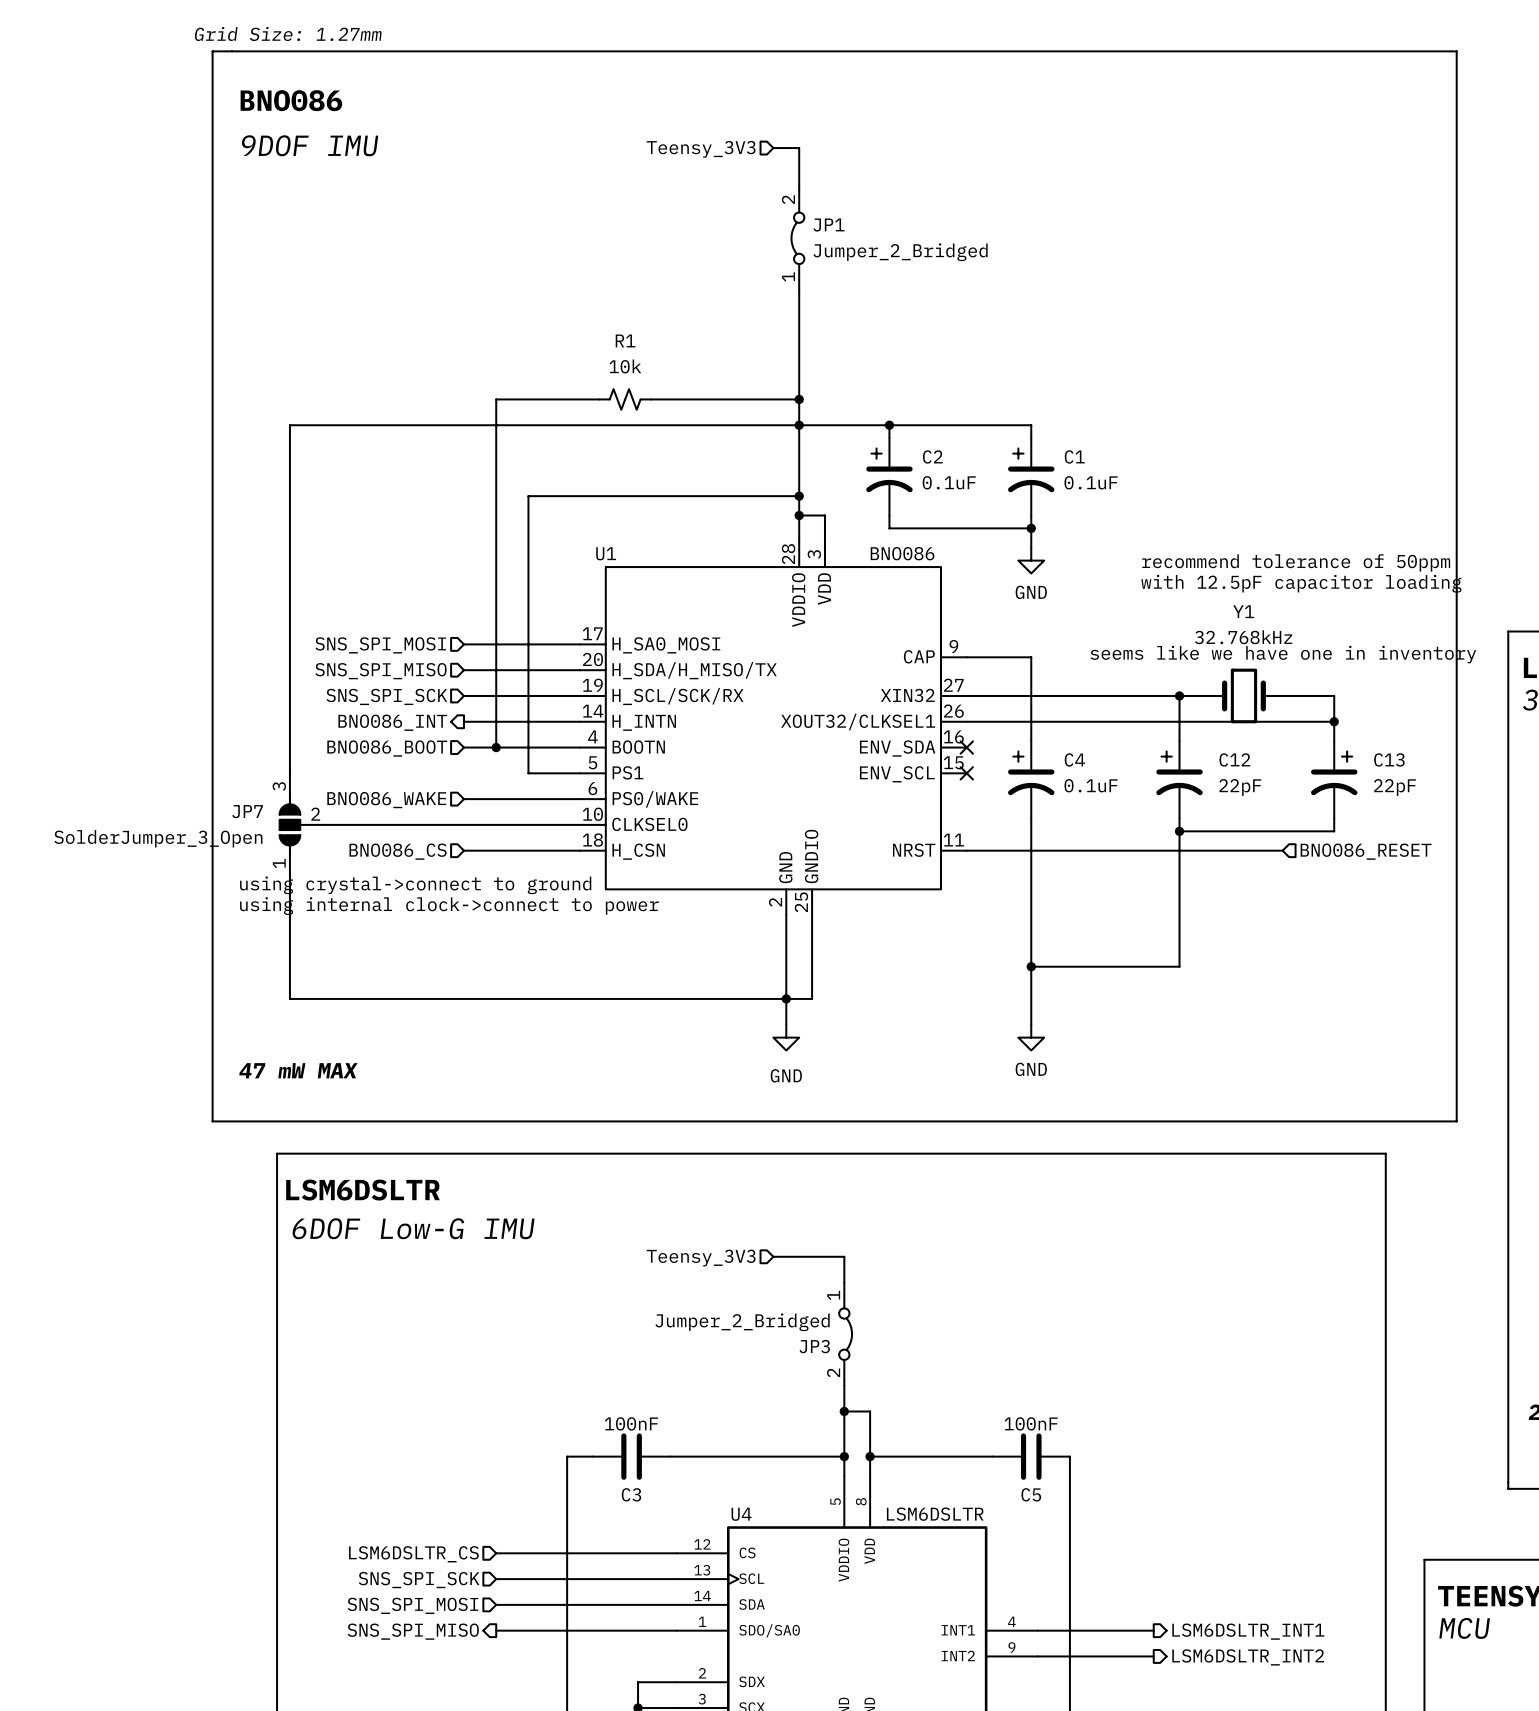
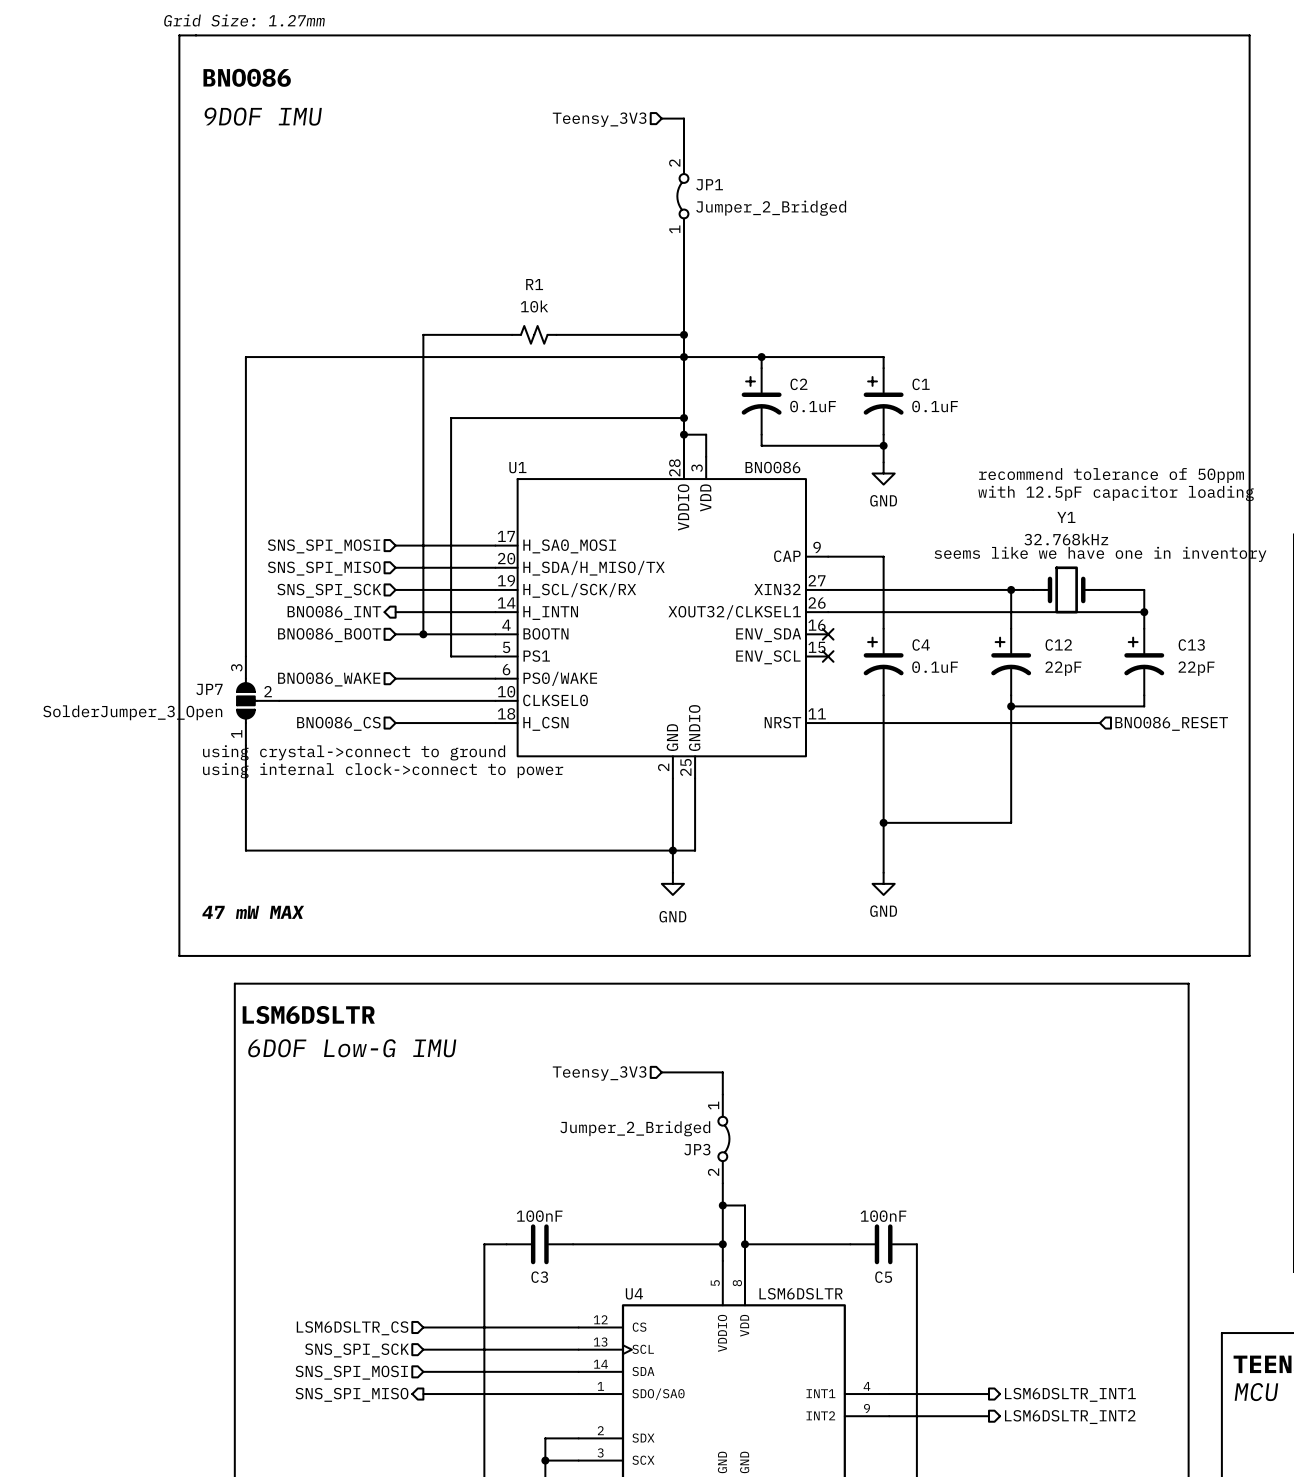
C13 flip: as is (1334, 773) -> left-right (1144, 656)

